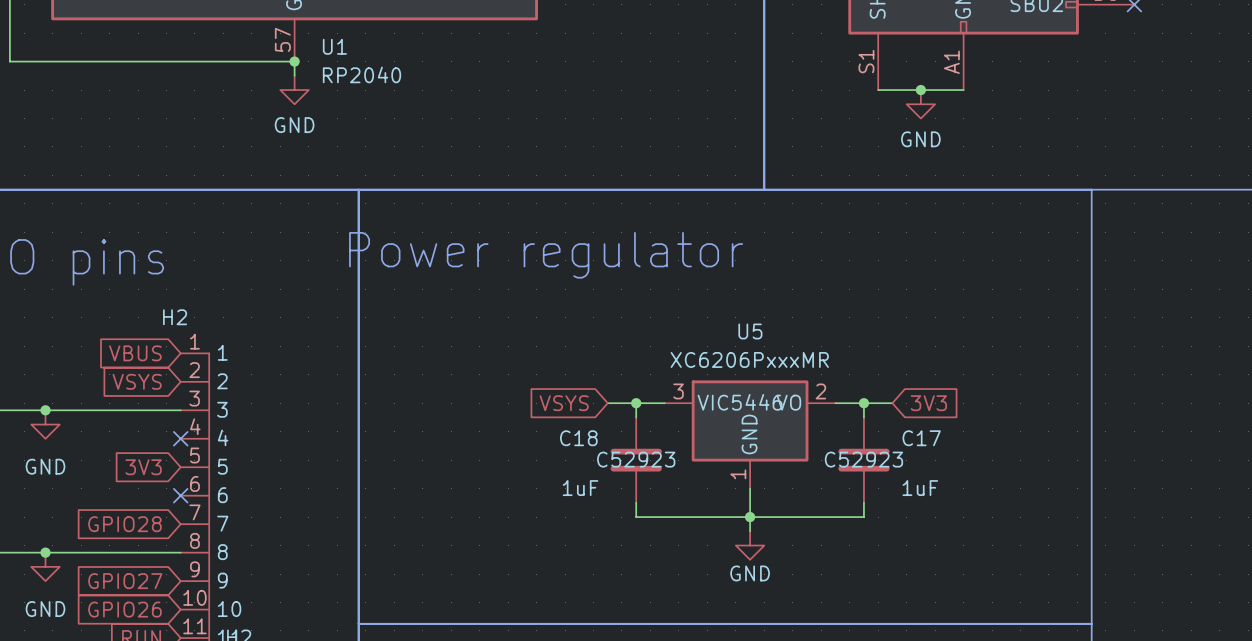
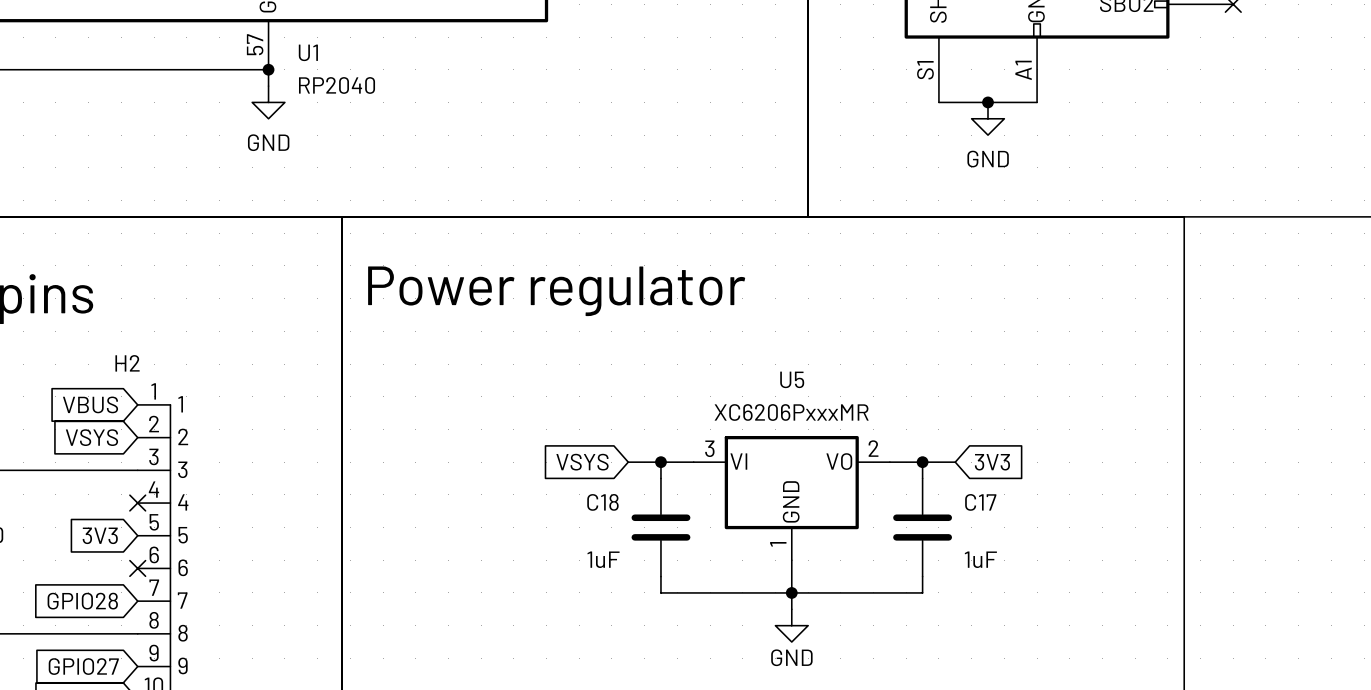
U5 text: C5446 (750, 402) -> none
C18 text: C52923 (636, 459) -> none
C17 text: C52923 (863, 459) -> none

